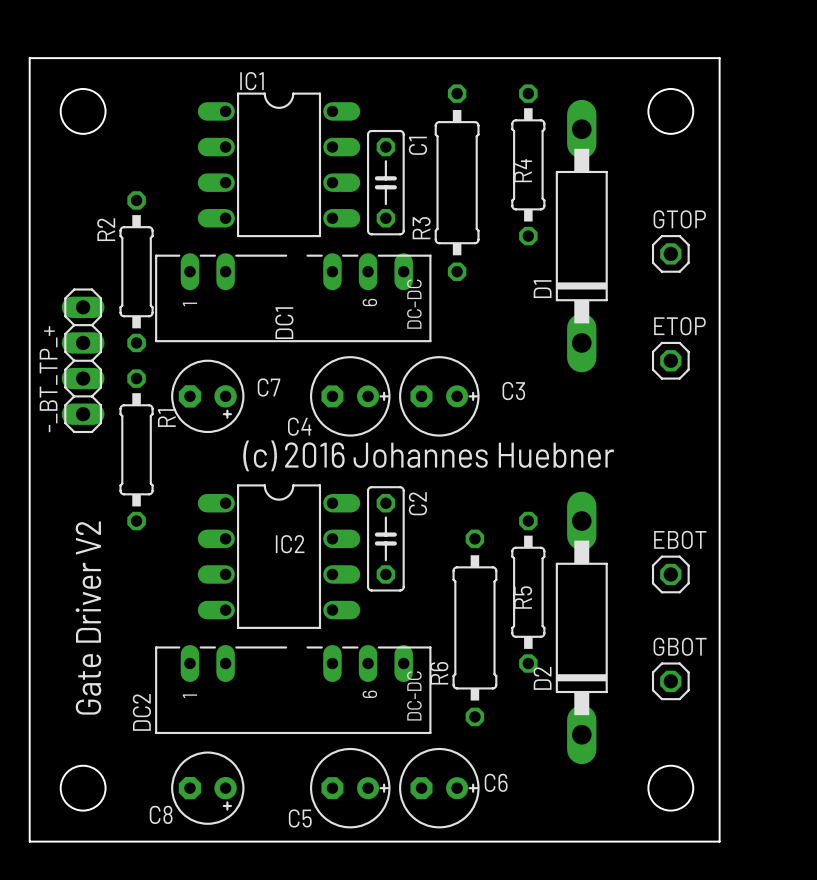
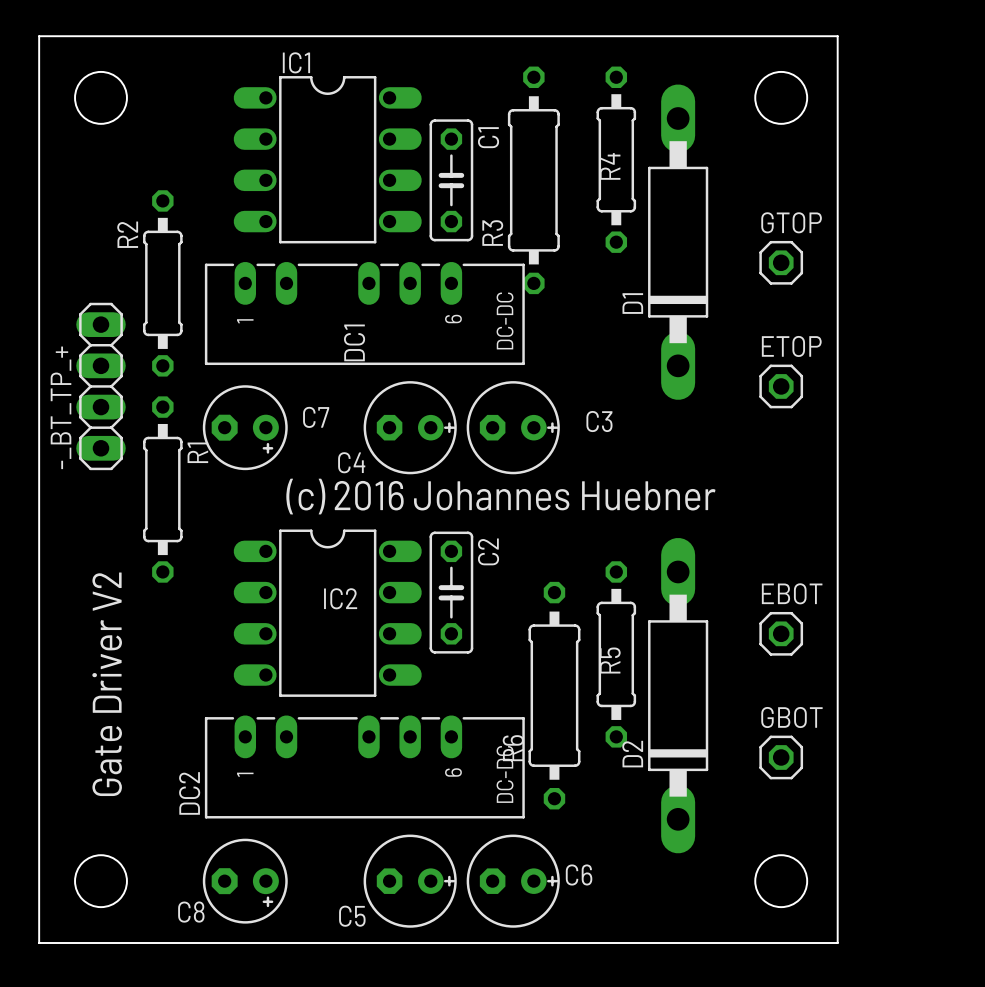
DC1 footprint: [155, 253, 432, 343] -> [204, 261, 525, 366]
DC2 footprint: [155, 644, 432, 735] -> [204, 715, 525, 819]

